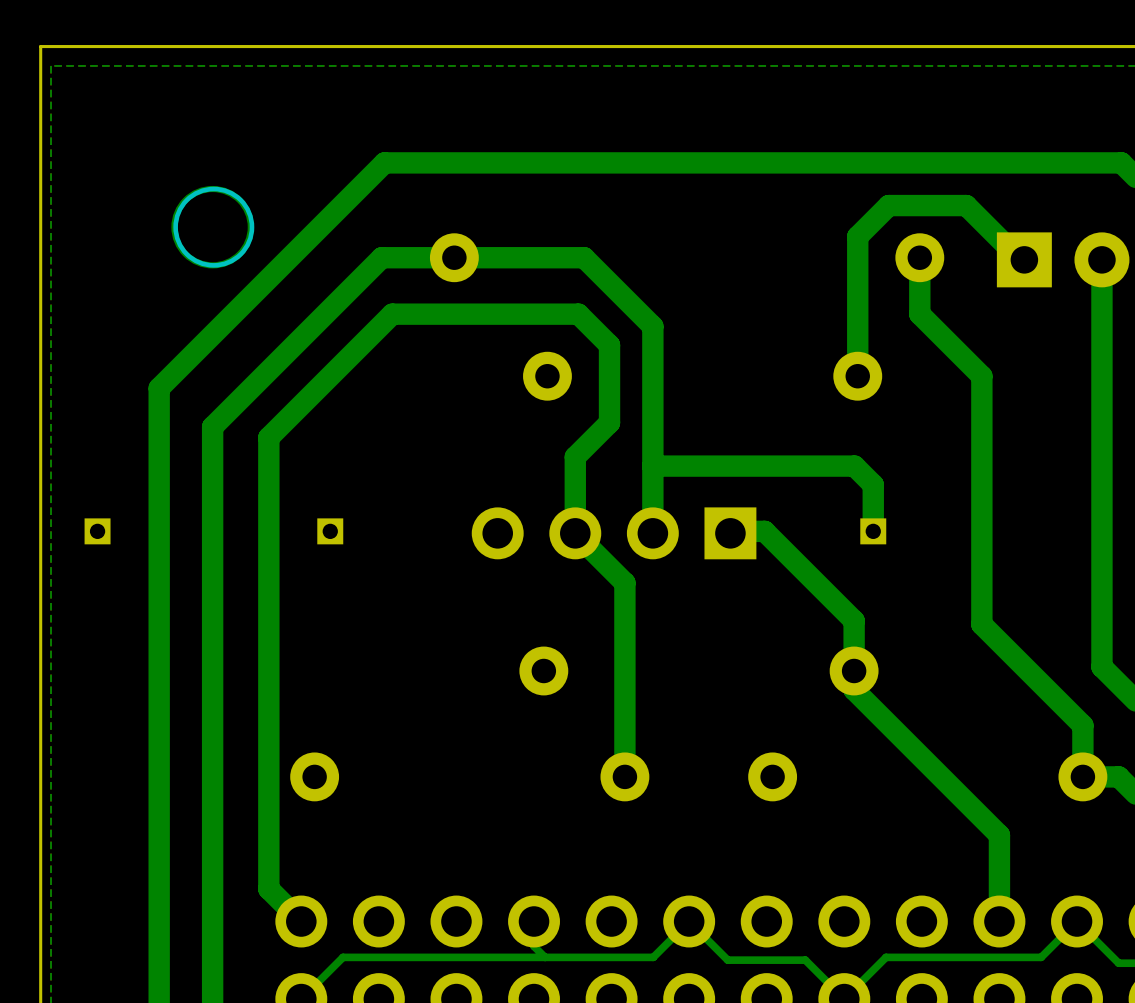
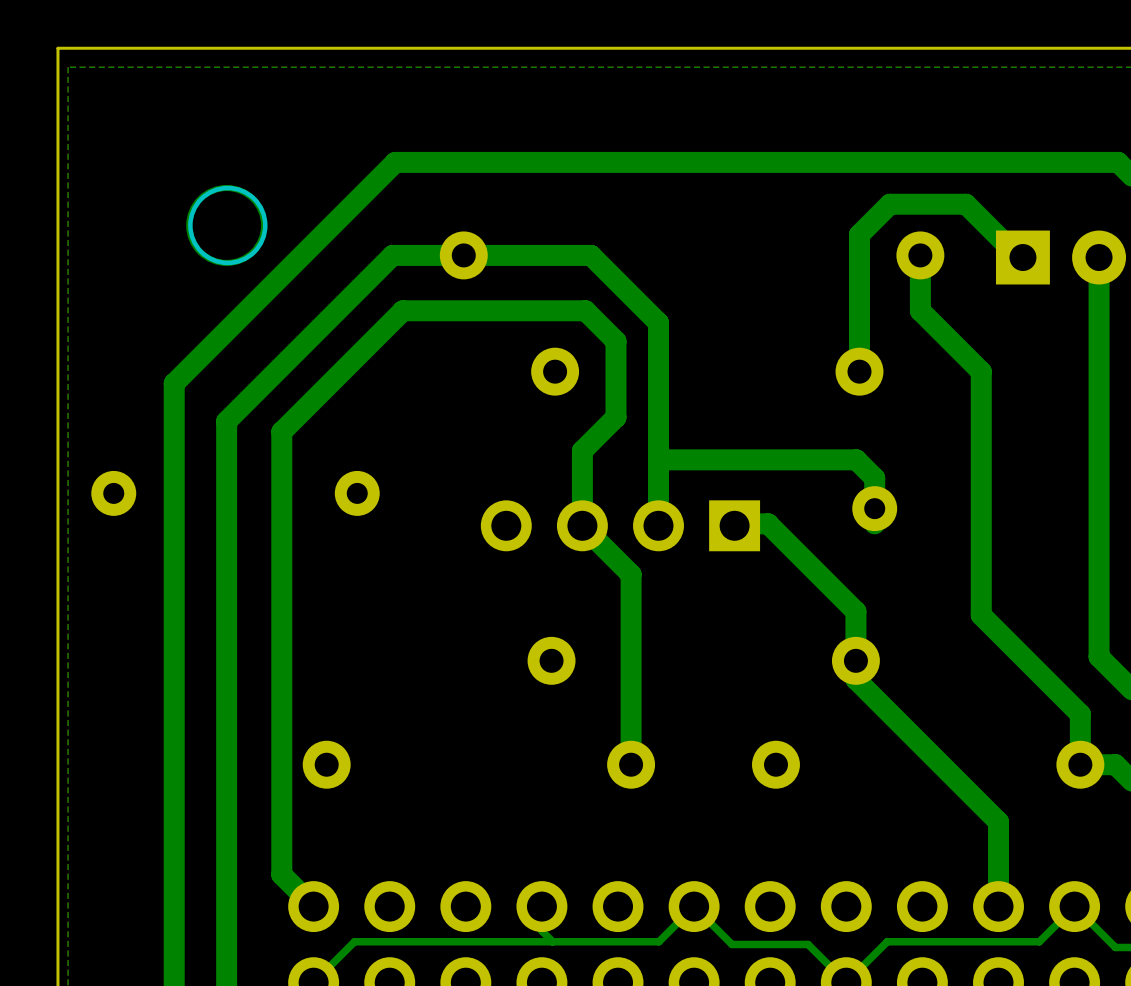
part: none -> (113, 493)
part: none -> (357, 493)
part footprint: [860, 518, 887, 545] -> [852, 486, 898, 532]
part: (97, 531) -> none
part: (330, 531) -> none

